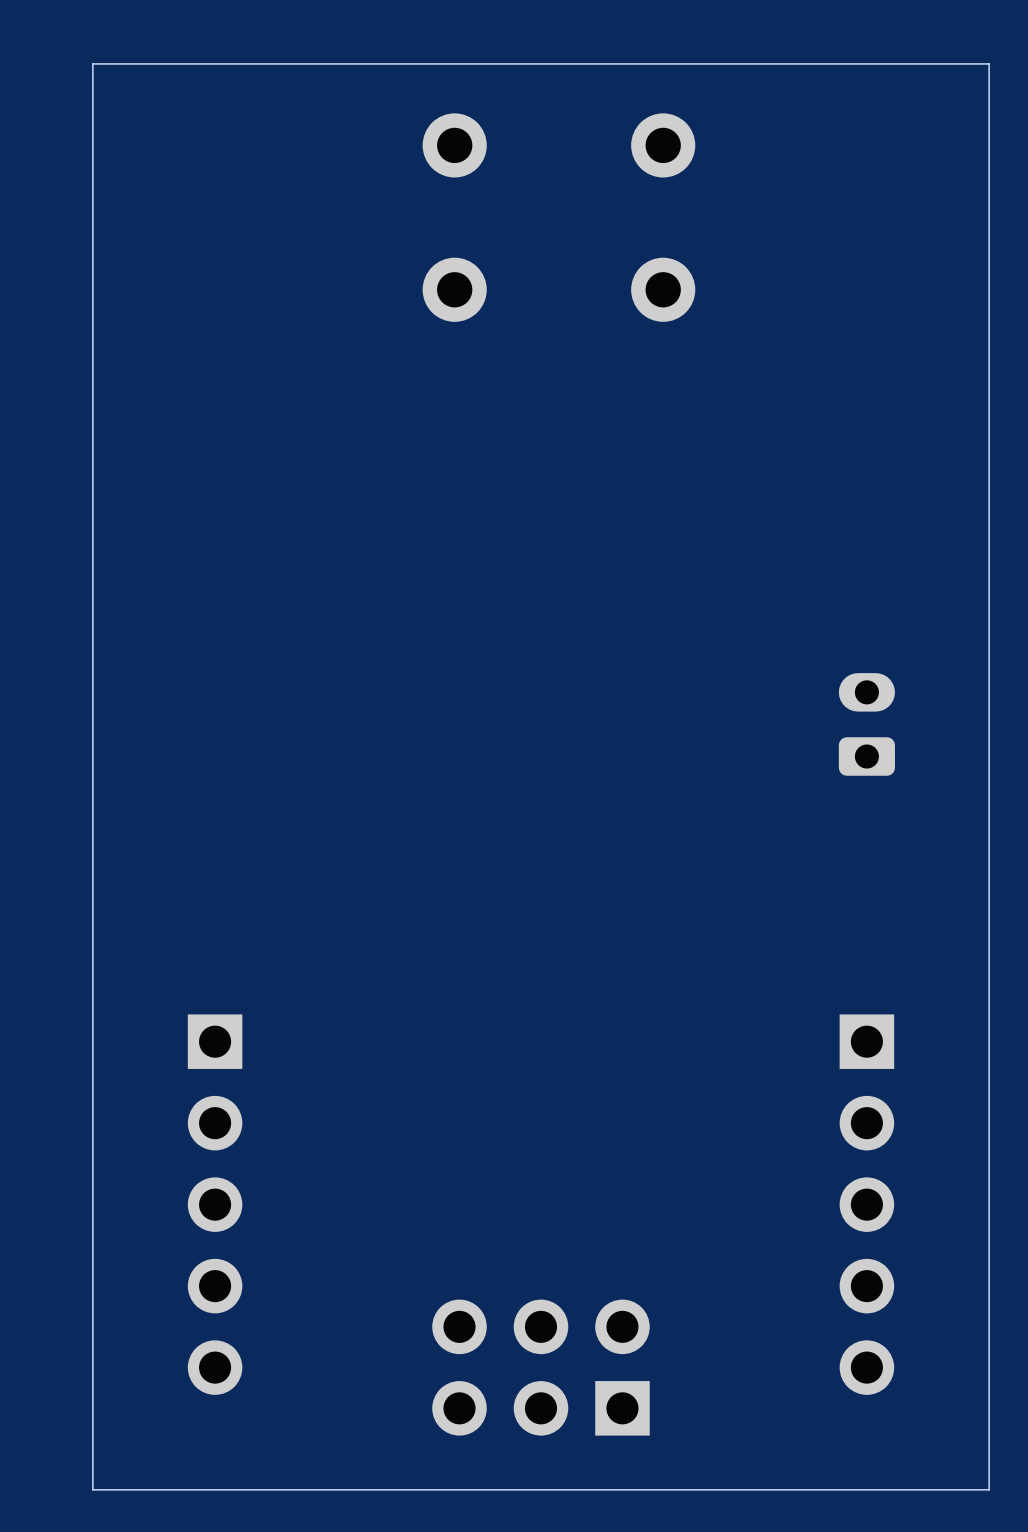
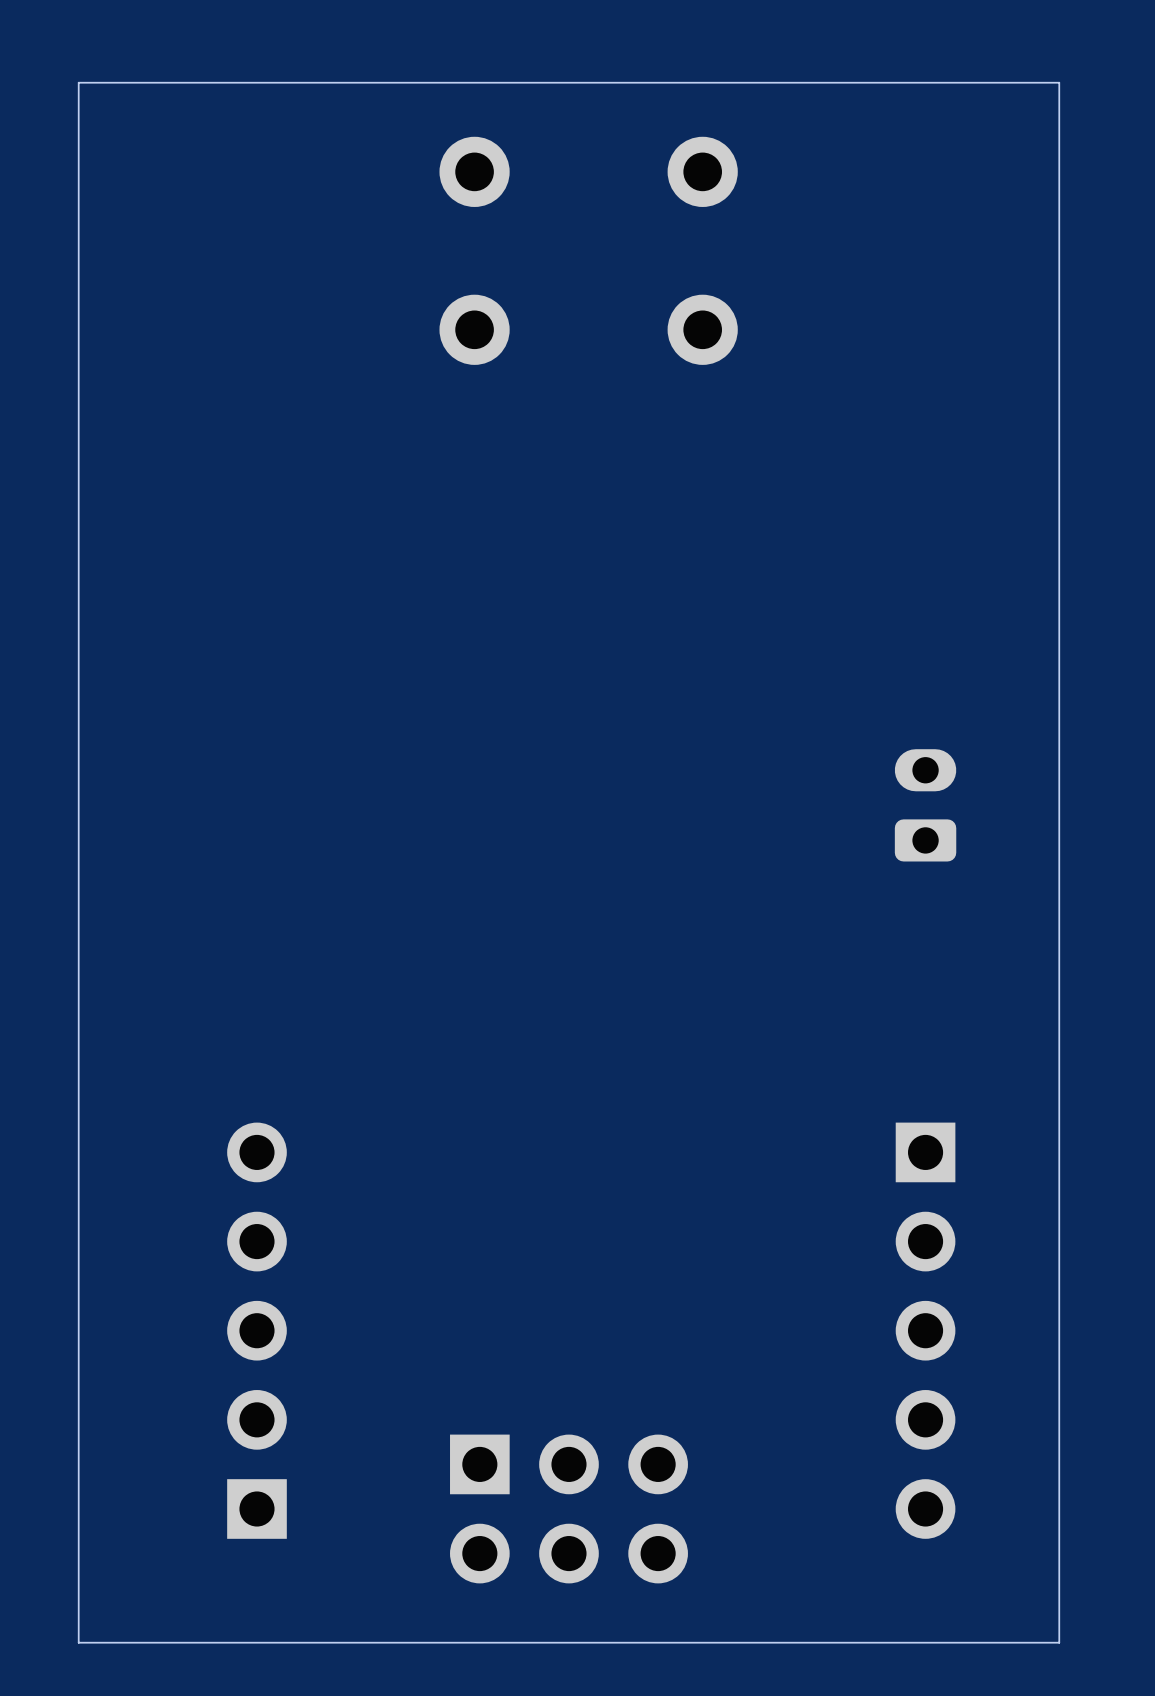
part rotation: 0° (215, 1204) -> 180° (256, 1330)
part rotation: 0° (540, 1367) -> 180° (568, 1508)

